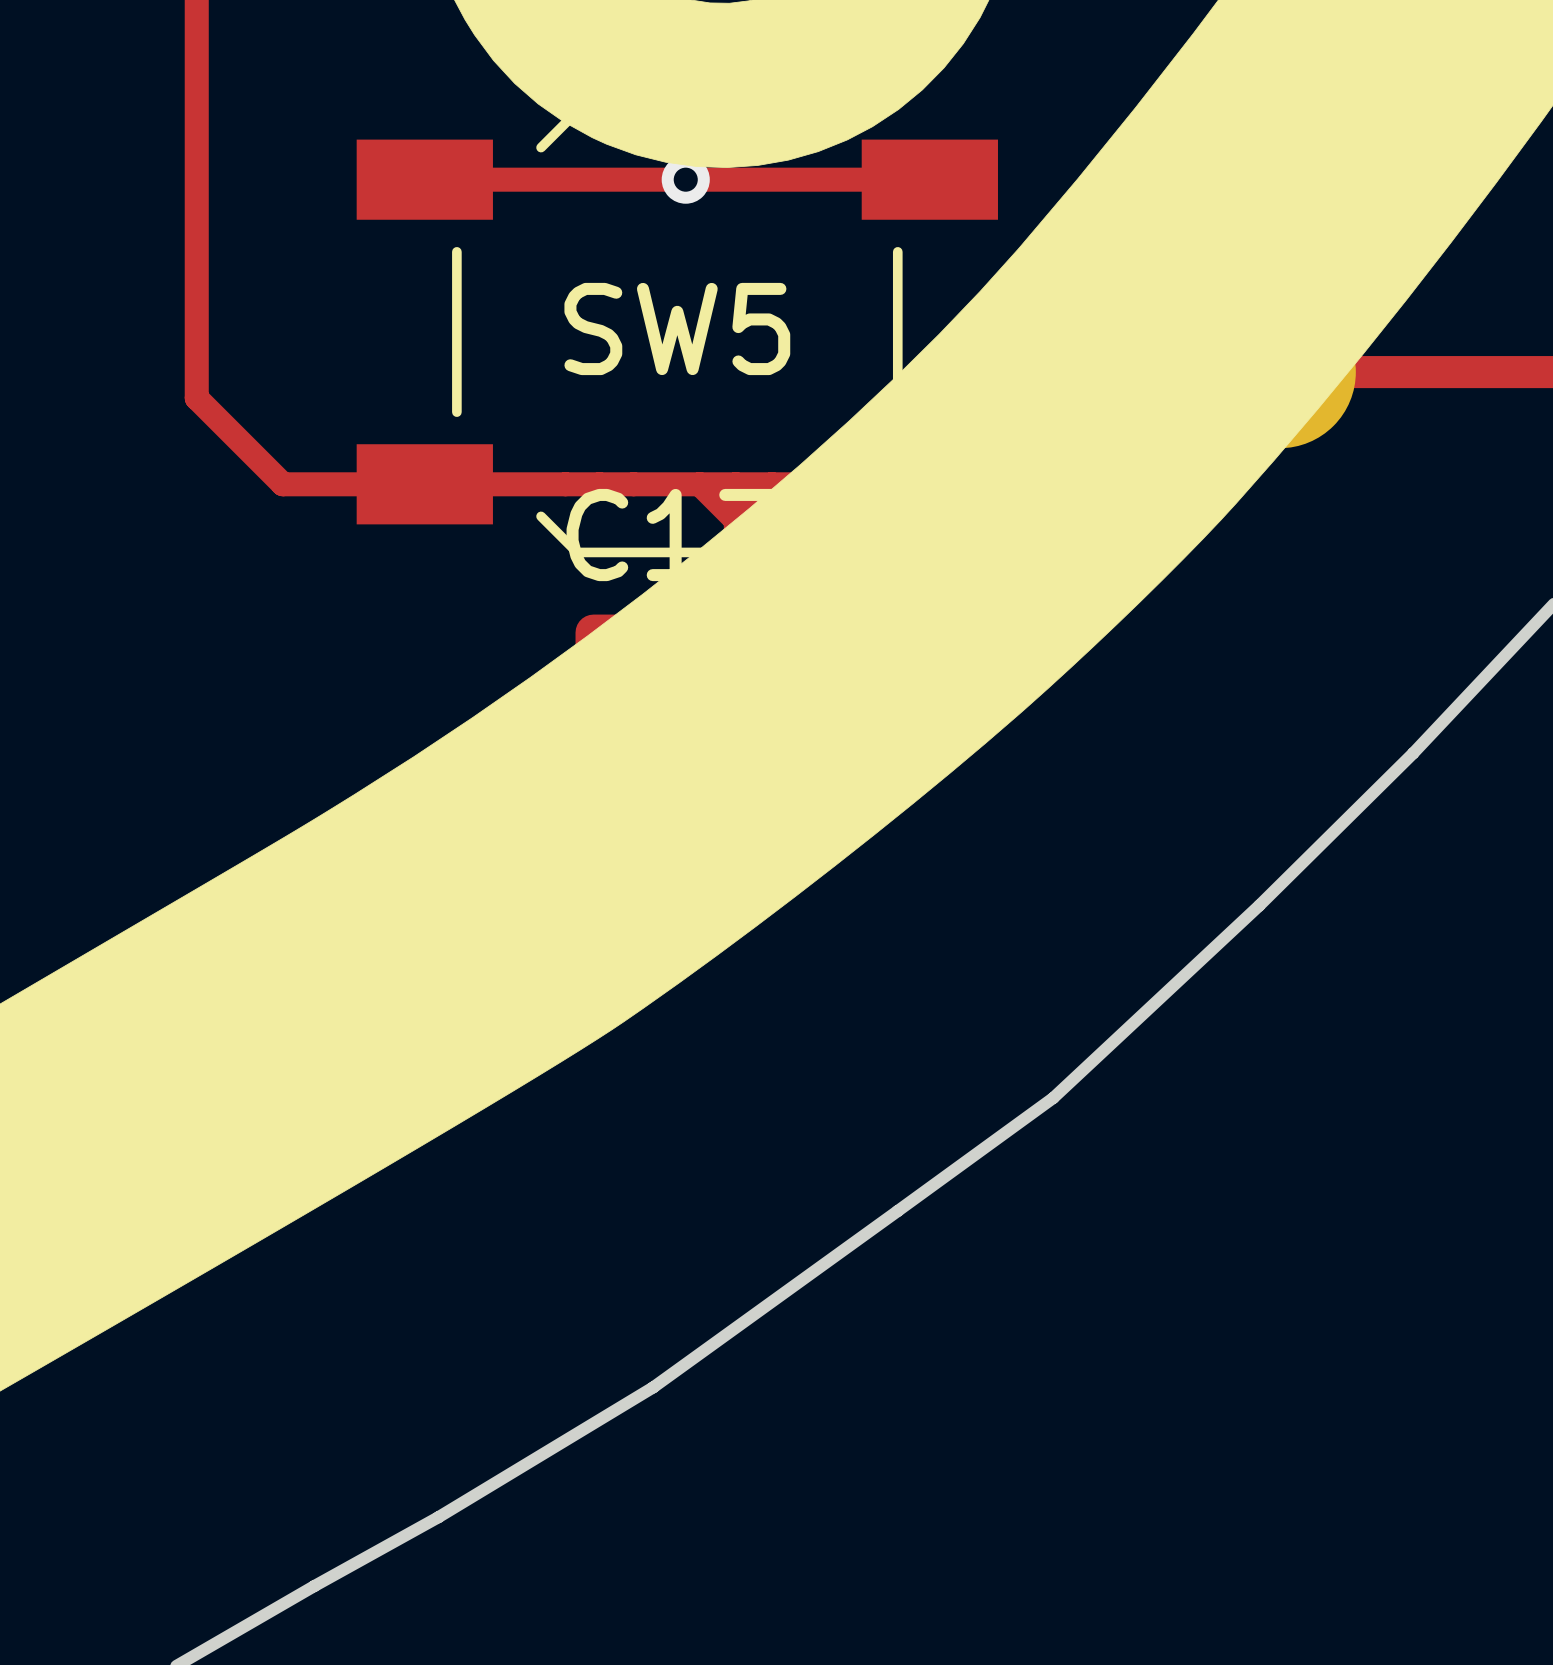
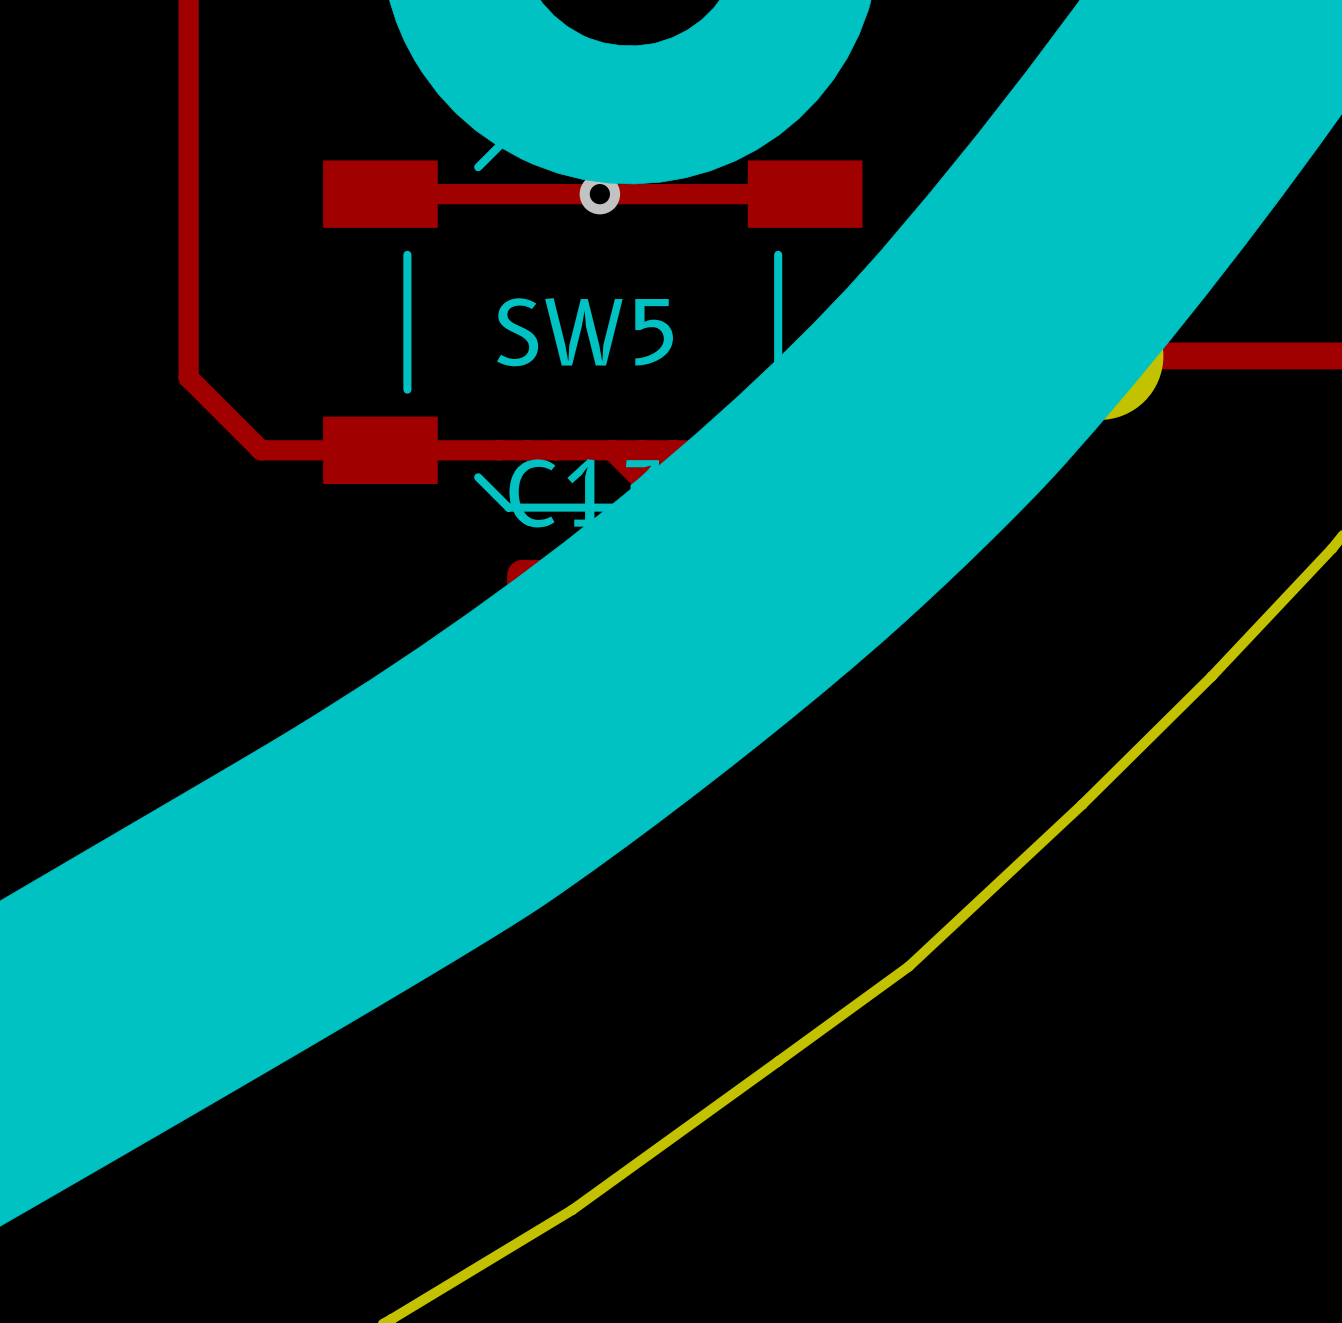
SW5 name position: SW5 (677, 328) -> SW5 (585, 332)

